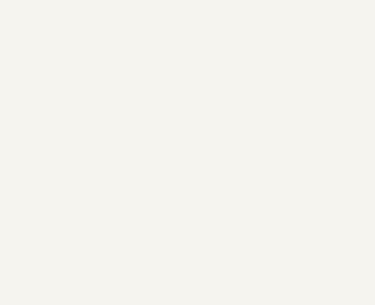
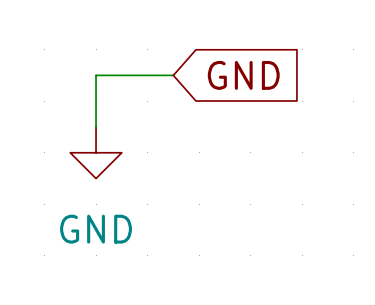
wire: none -> (173, 75) (96, 75) (96, 126)
global label: none -> GND (243, 75)
power symbol: none -> GND (96, 152)

